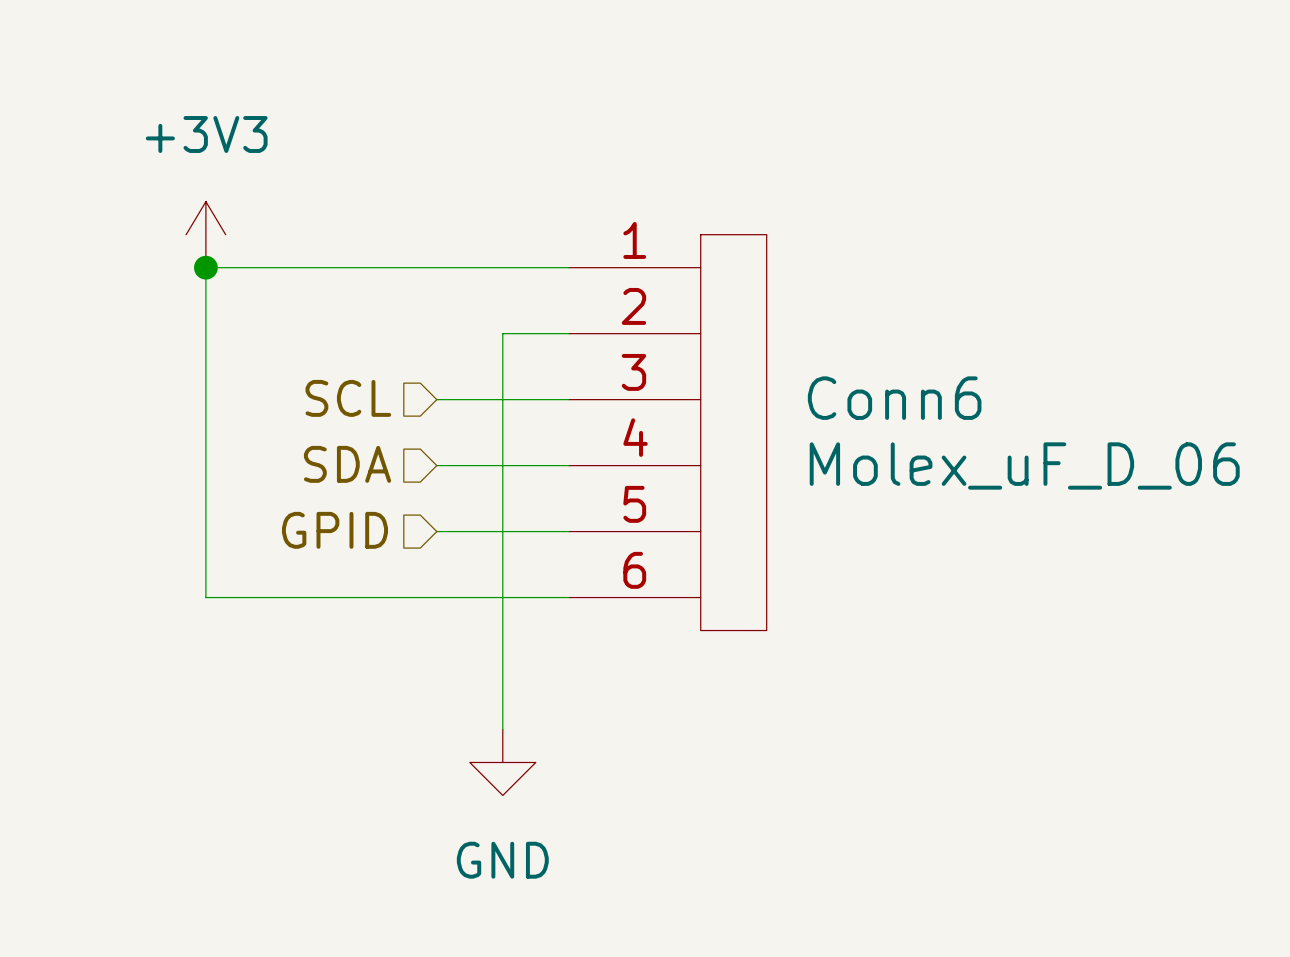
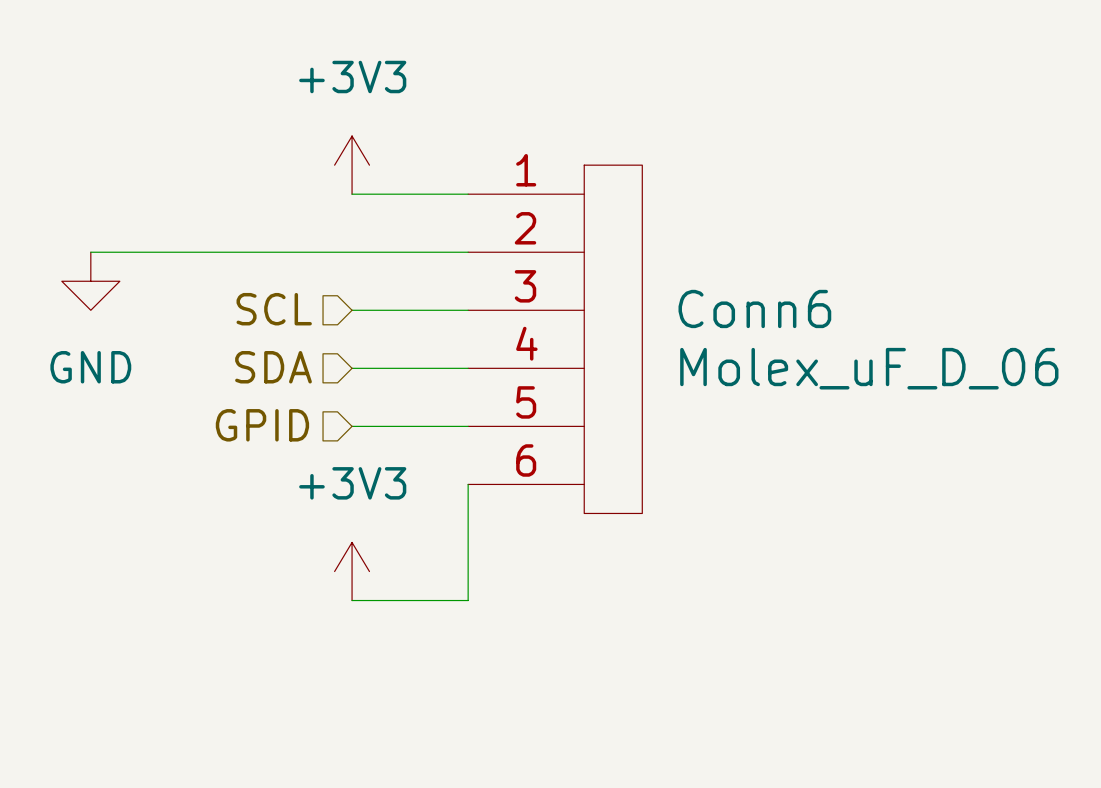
power symbol position: +3V3 (205, 234) -> +3V3 (352, 165)
junction: (205, 267) -> none
wire: (436, 267) (205, 267) (205, 597) (568, 597) -> (352, 600) (468, 600) (468, 484)
wire: (502, 333) (502, 729) -> (410, 252) (90, 252)
power symbol: none -> +3V3 (352, 571)
power symbol position: GND (502, 762) -> GND (90, 281)

